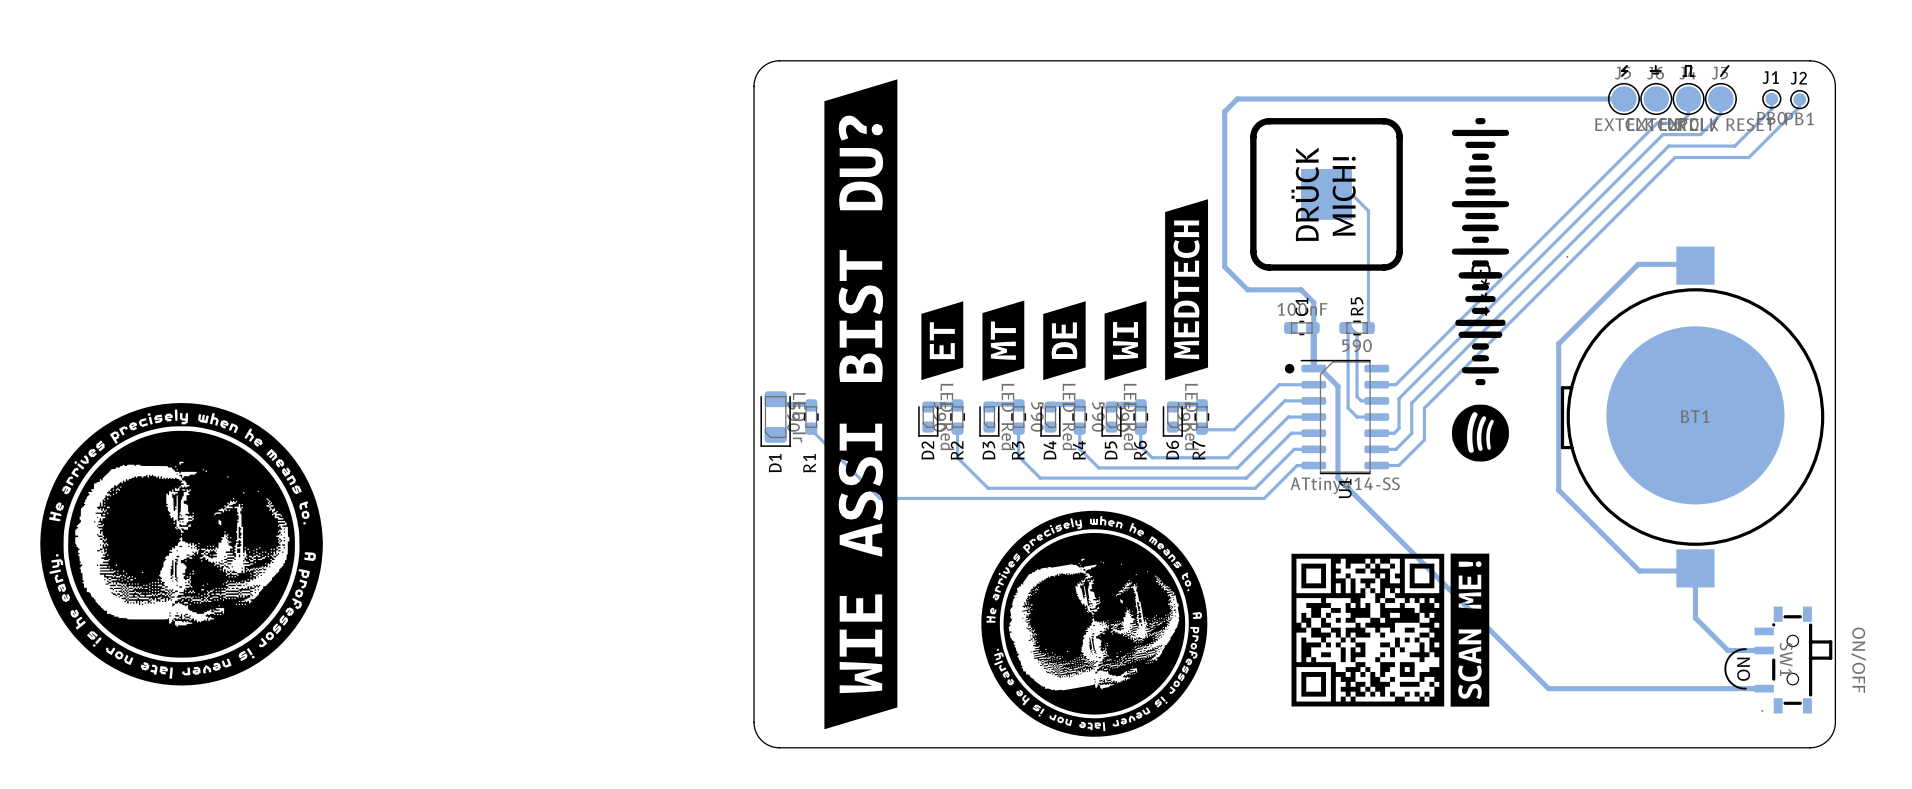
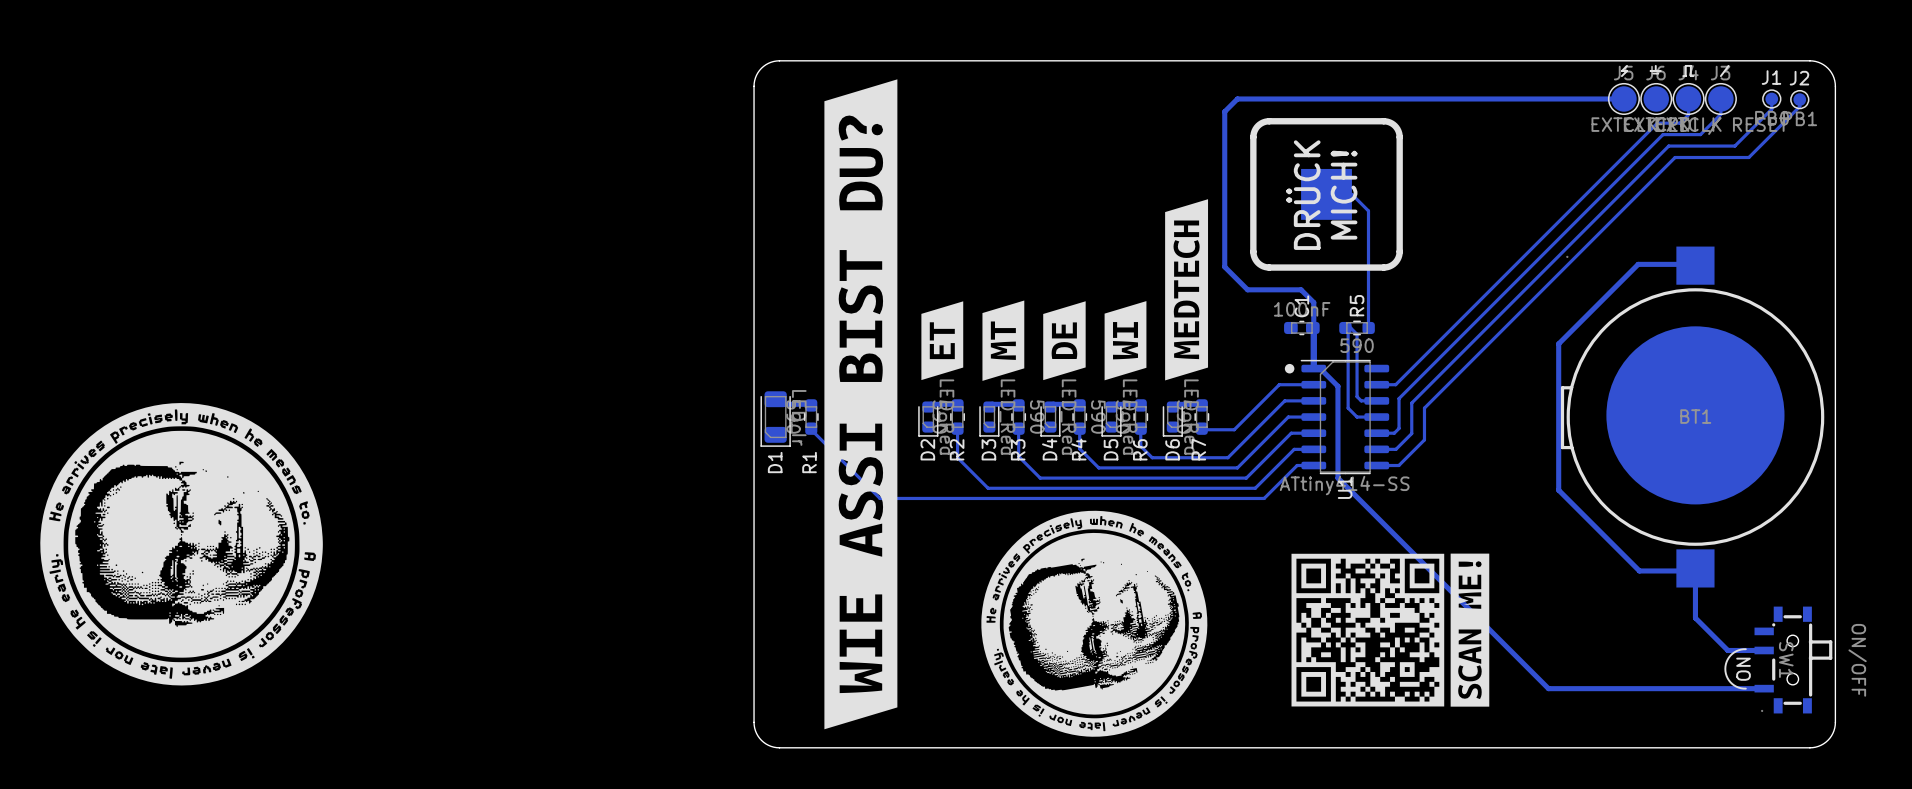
part: (1480, 289) -> none

